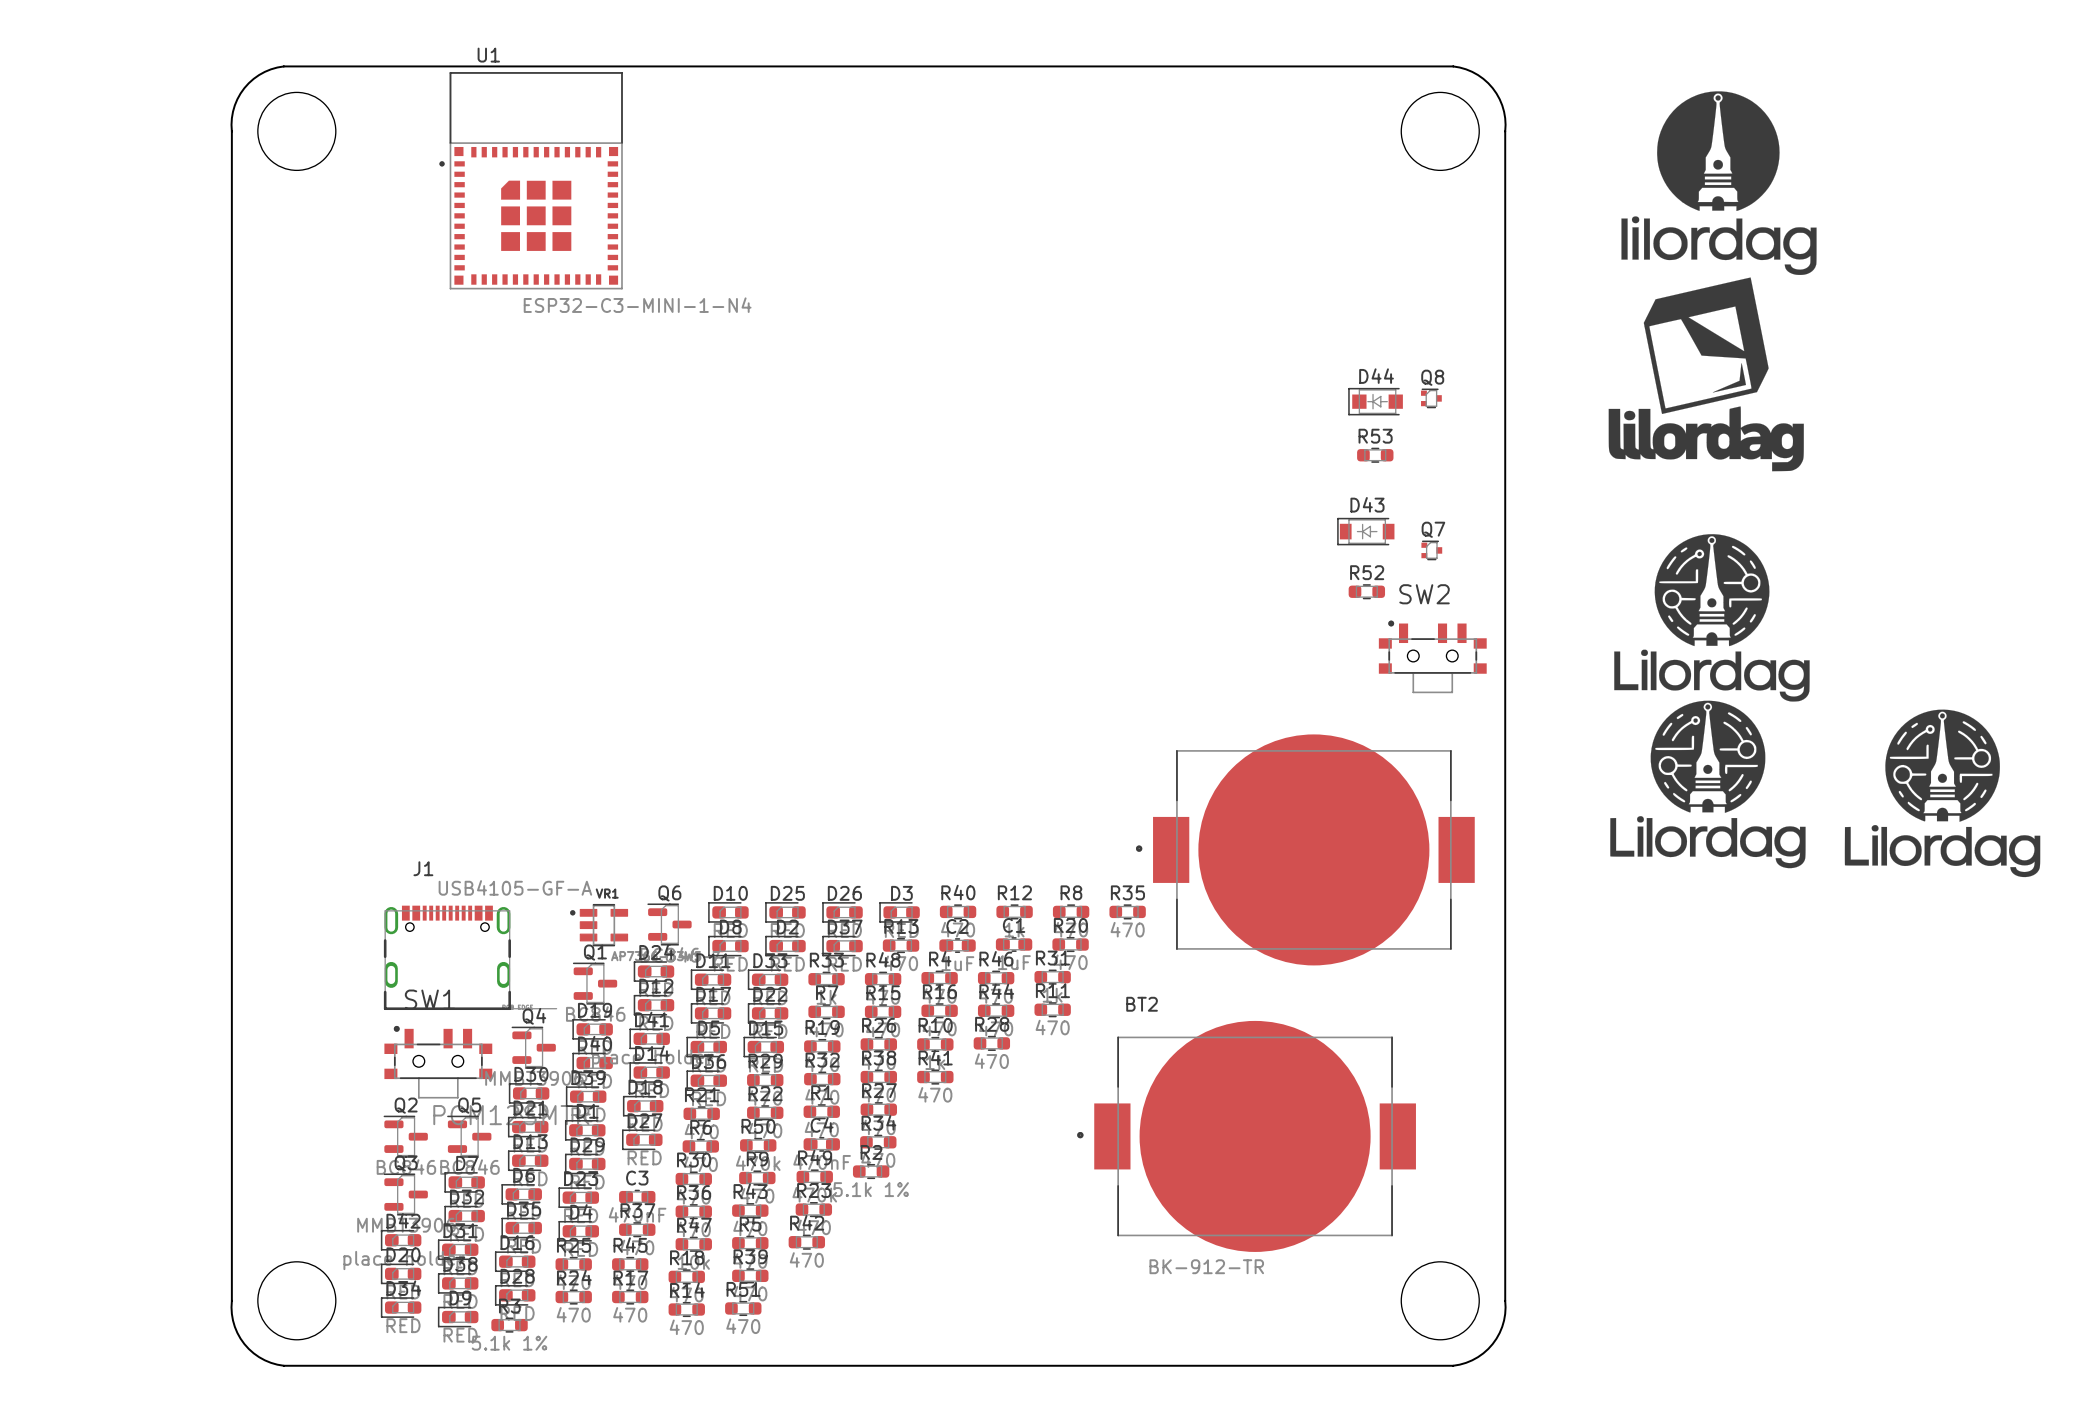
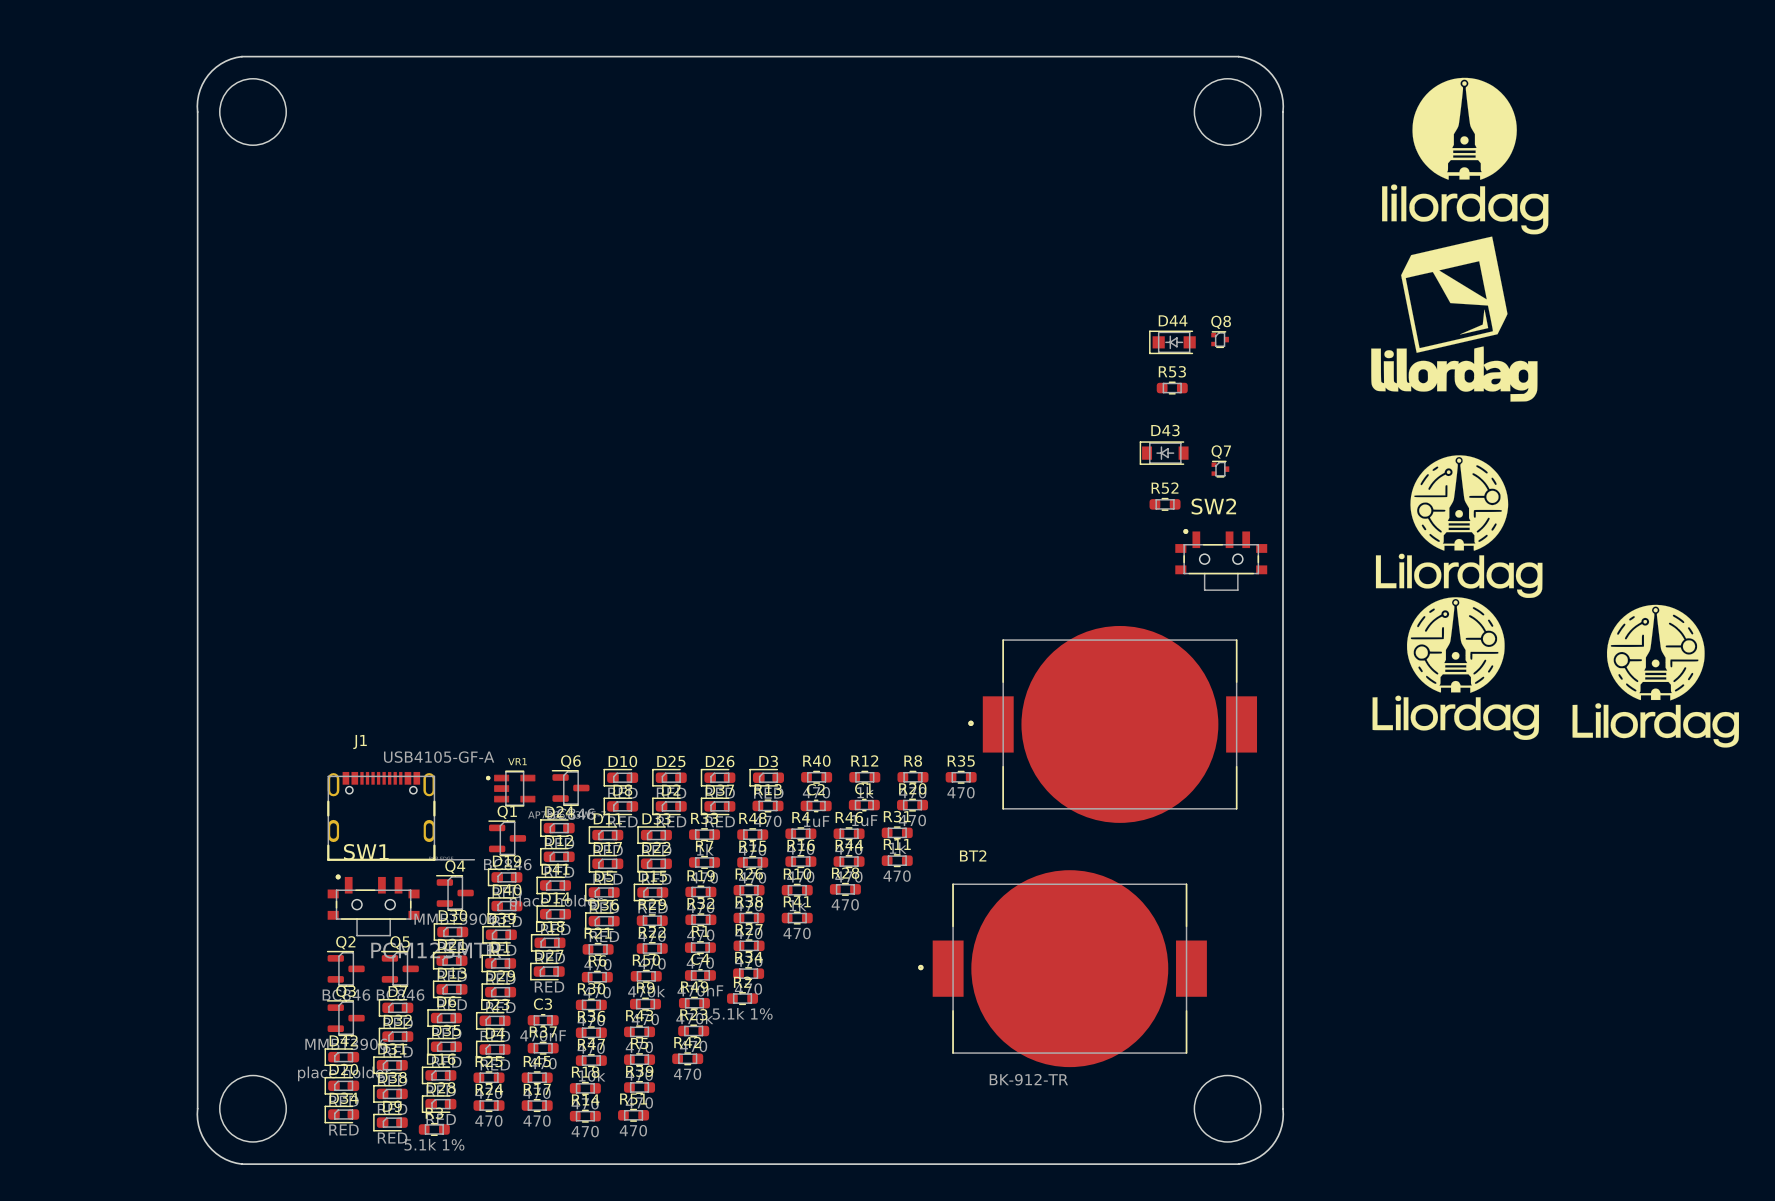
U1: ESP32-C3-MINI-1-N4 (531, 180) -> none

